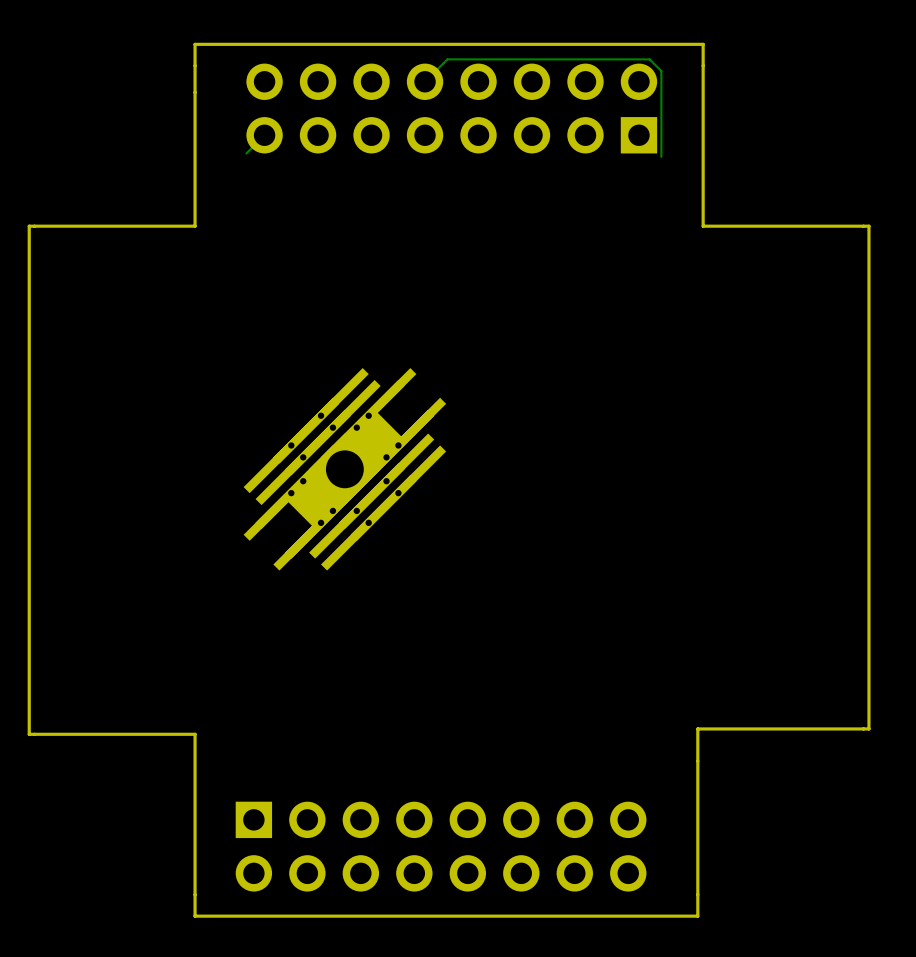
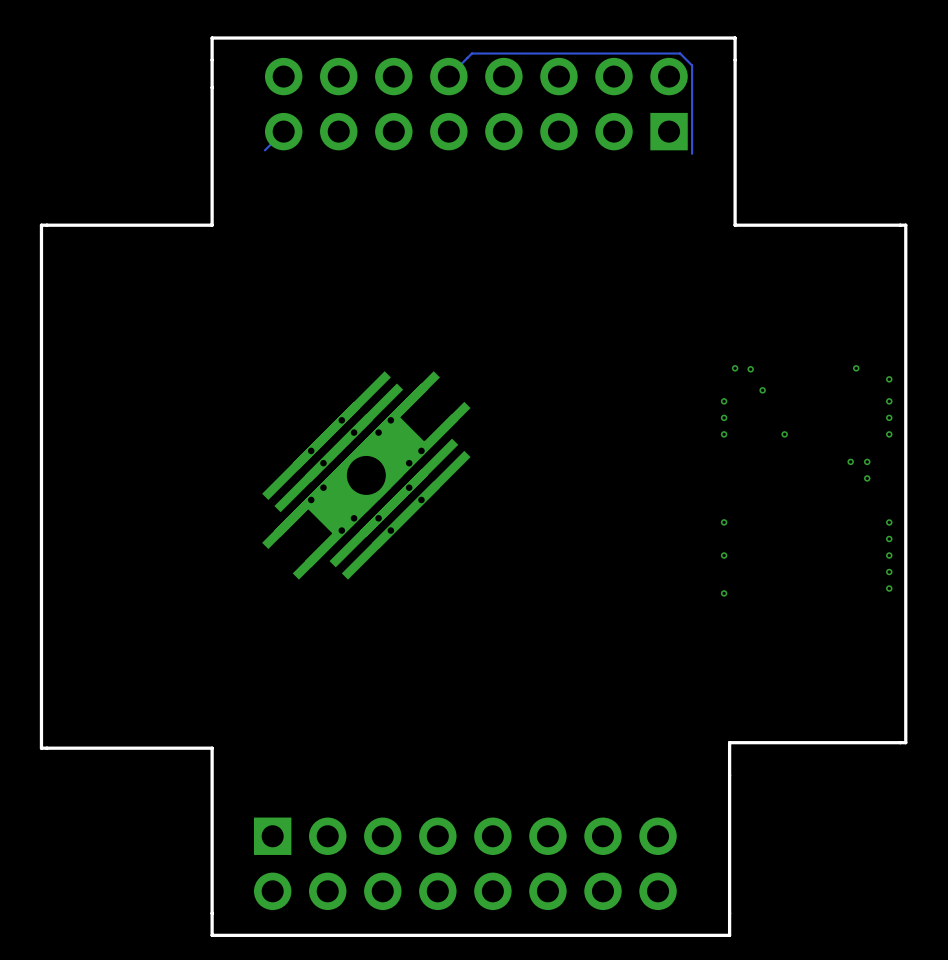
via: none -> (735, 368)
via: none -> (856, 368)
via: none -> (750, 369)
via: none -> (889, 379)
via: none -> (762, 390)
via: none -> (724, 401)
via: none -> (889, 401)
via: none -> (724, 417)
via: none -> (889, 417)
via: none -> (724, 434)
via: none -> (784, 434)
via: none -> (889, 434)
via: none -> (850, 461)
via: none -> (867, 461)
via: none -> (867, 478)
via: none -> (724, 522)
via: none -> (889, 522)
via: none -> (889, 538)
via: none -> (724, 555)
via: none -> (889, 555)
via: none -> (889, 572)
via: none -> (889, 588)
via: none -> (724, 593)

